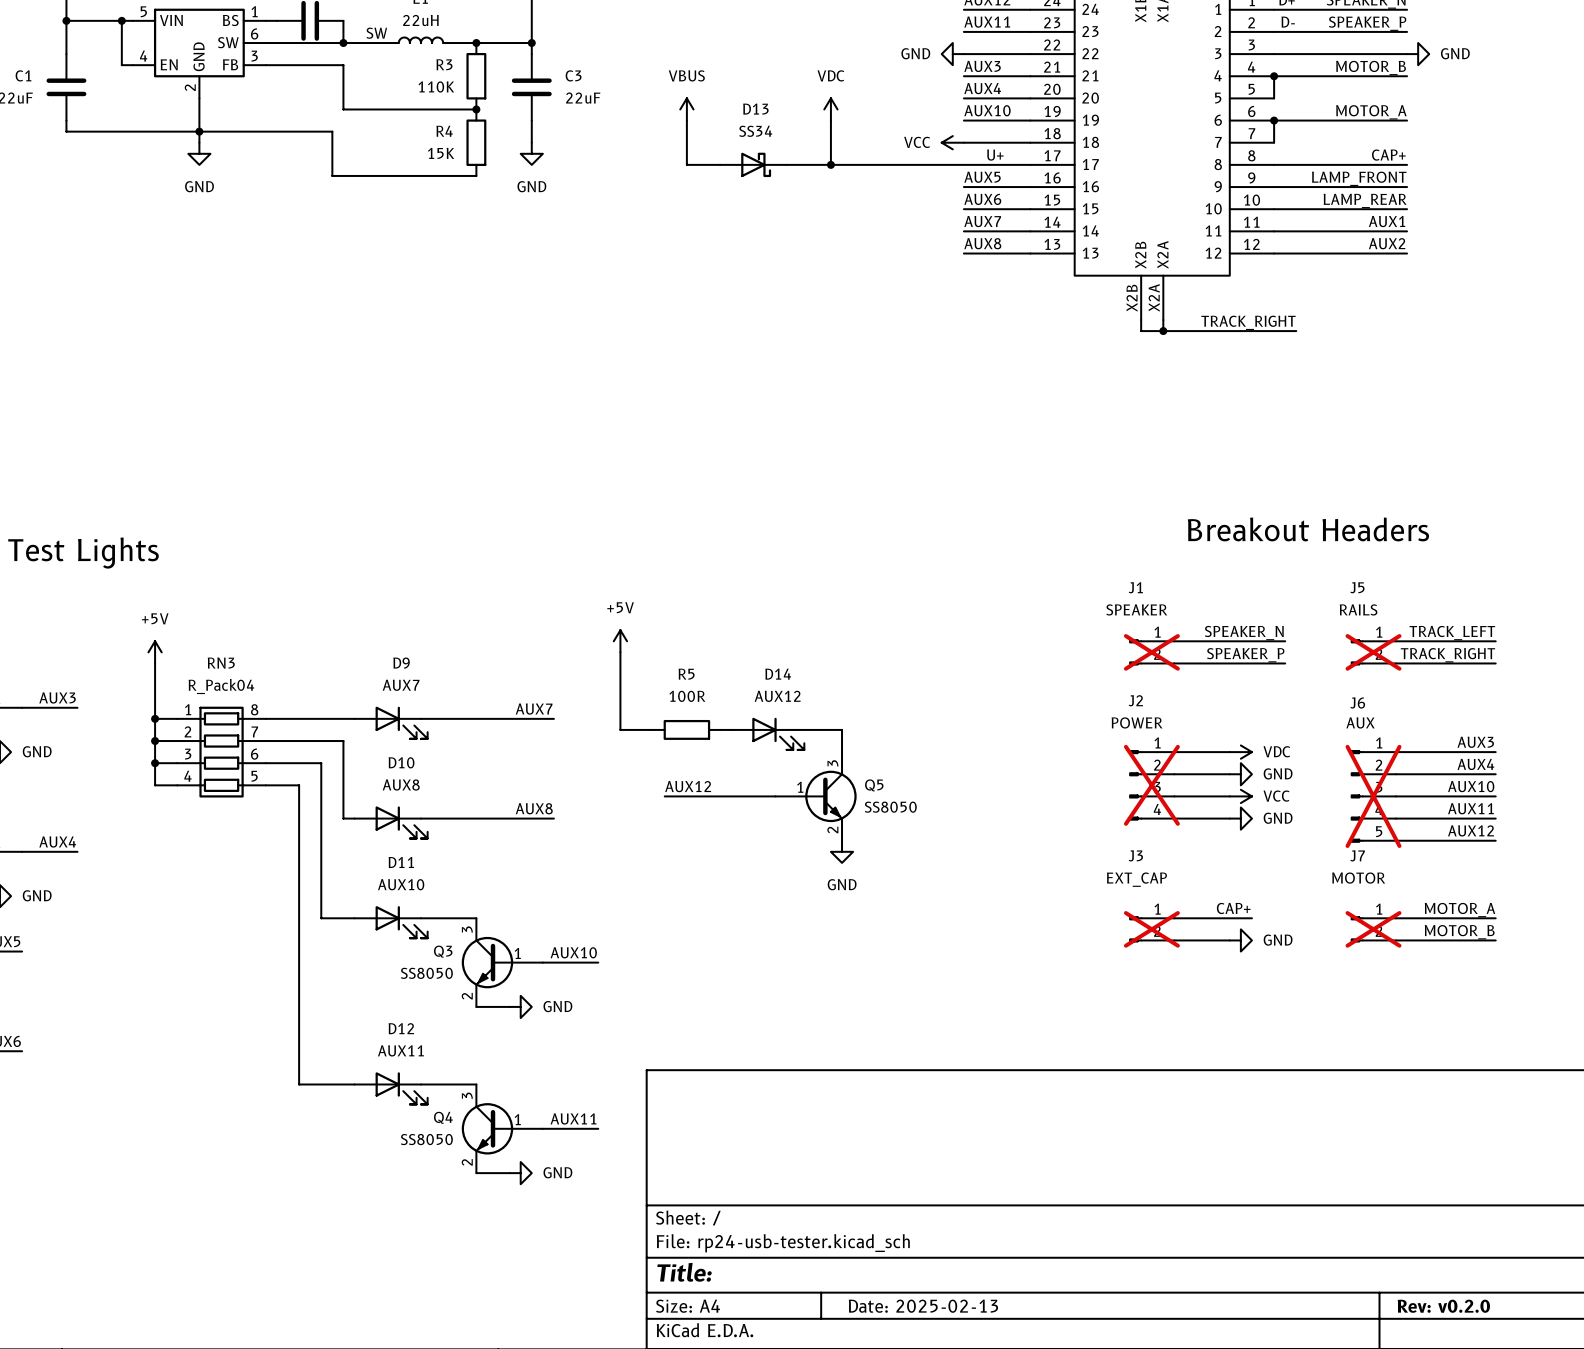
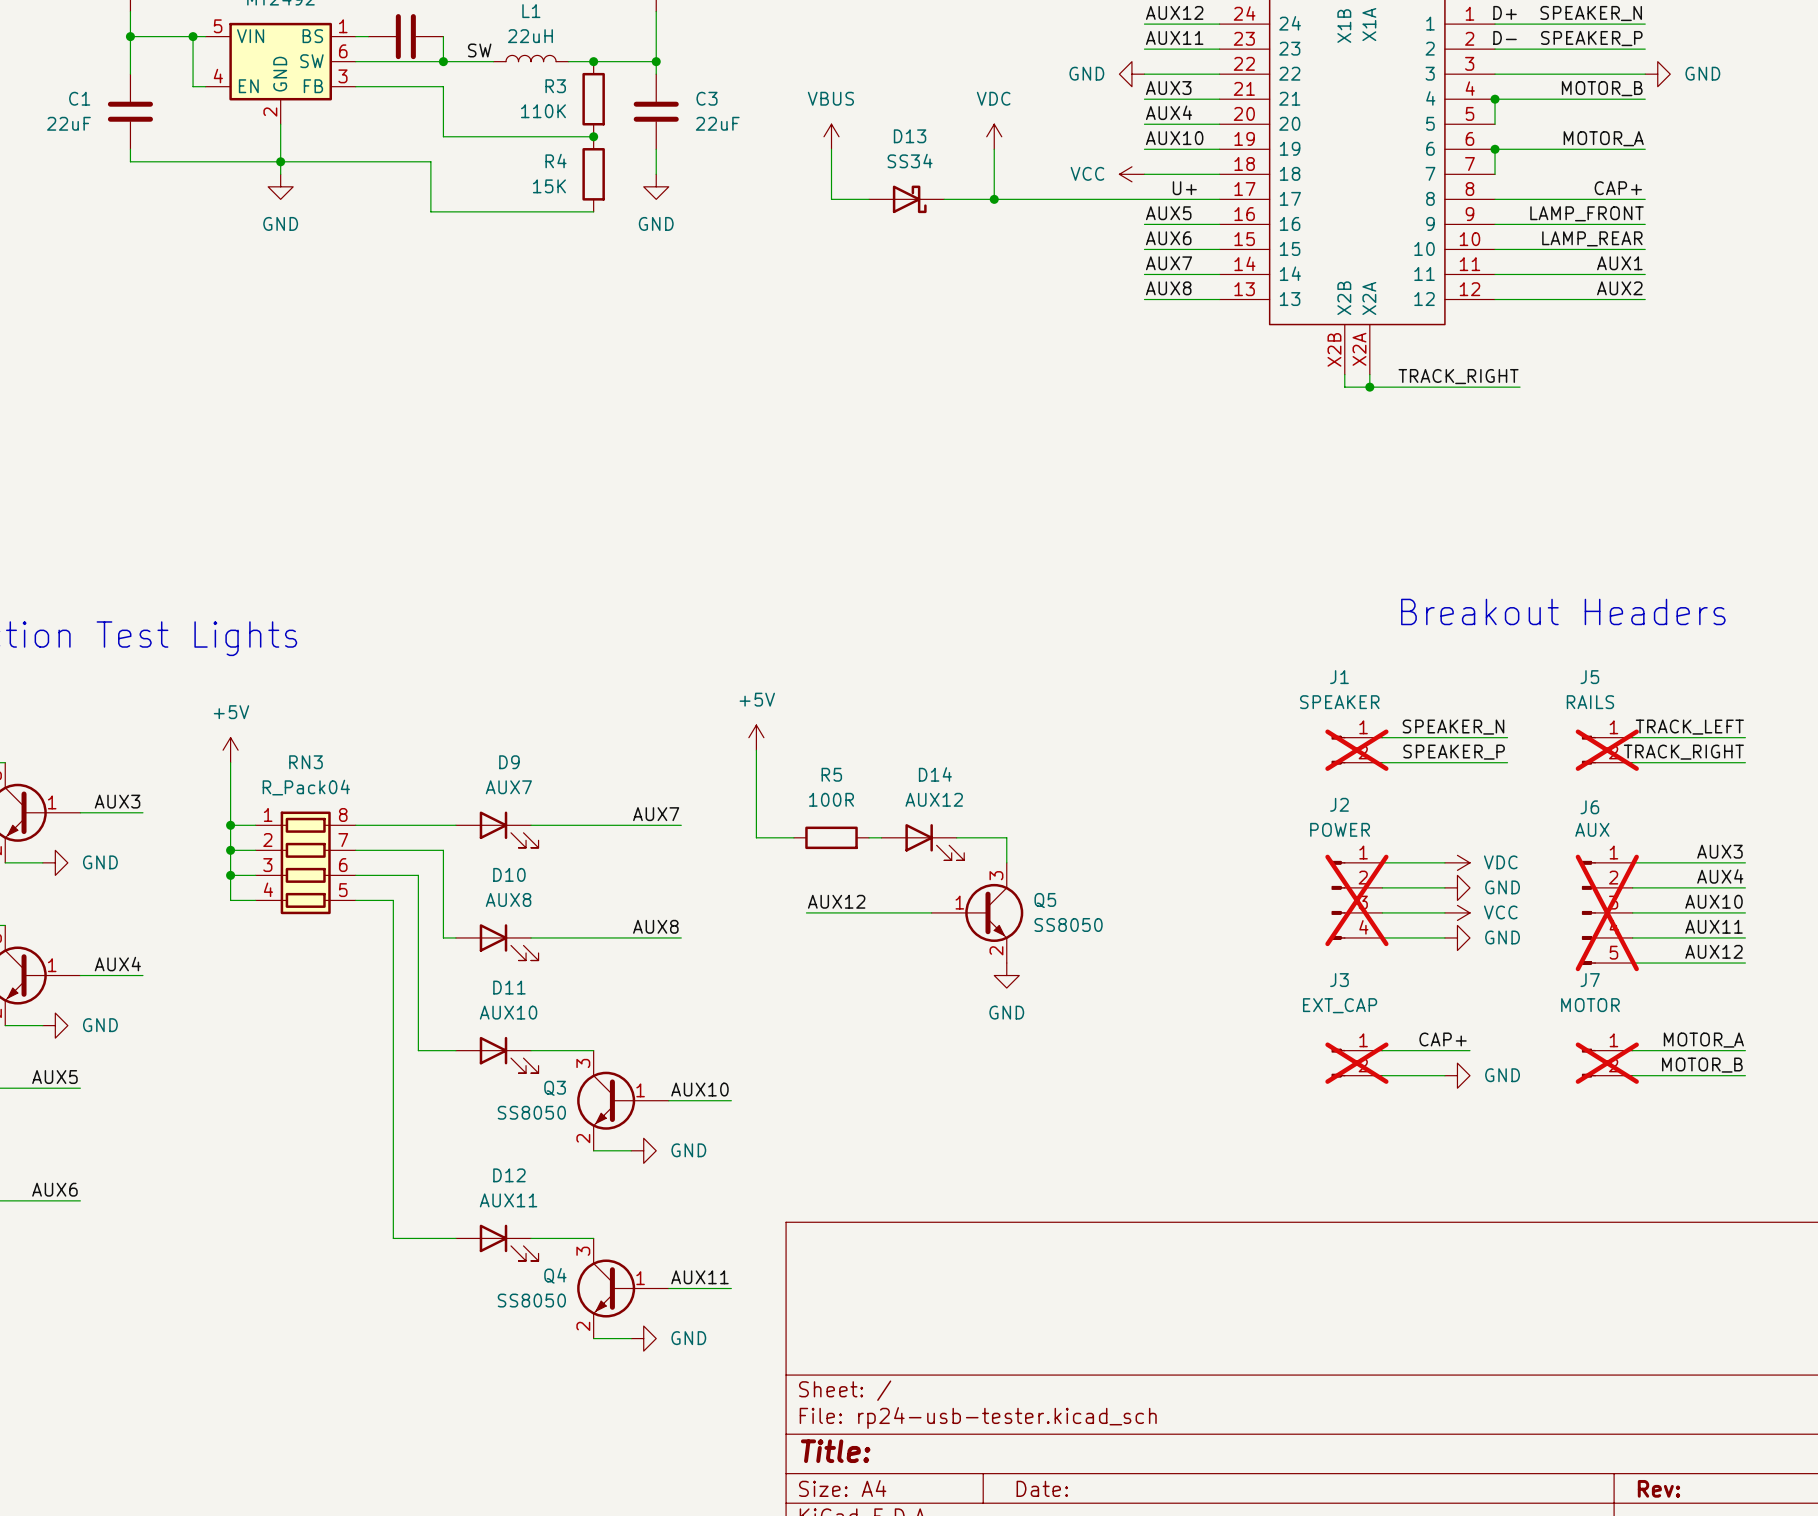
title block: Date: 2025-02-13 (923, 1306) -> Date: (1042, 1488)
title block: Rev: v0.2.0 (1443, 1306) -> Rev: (1658, 1488)

